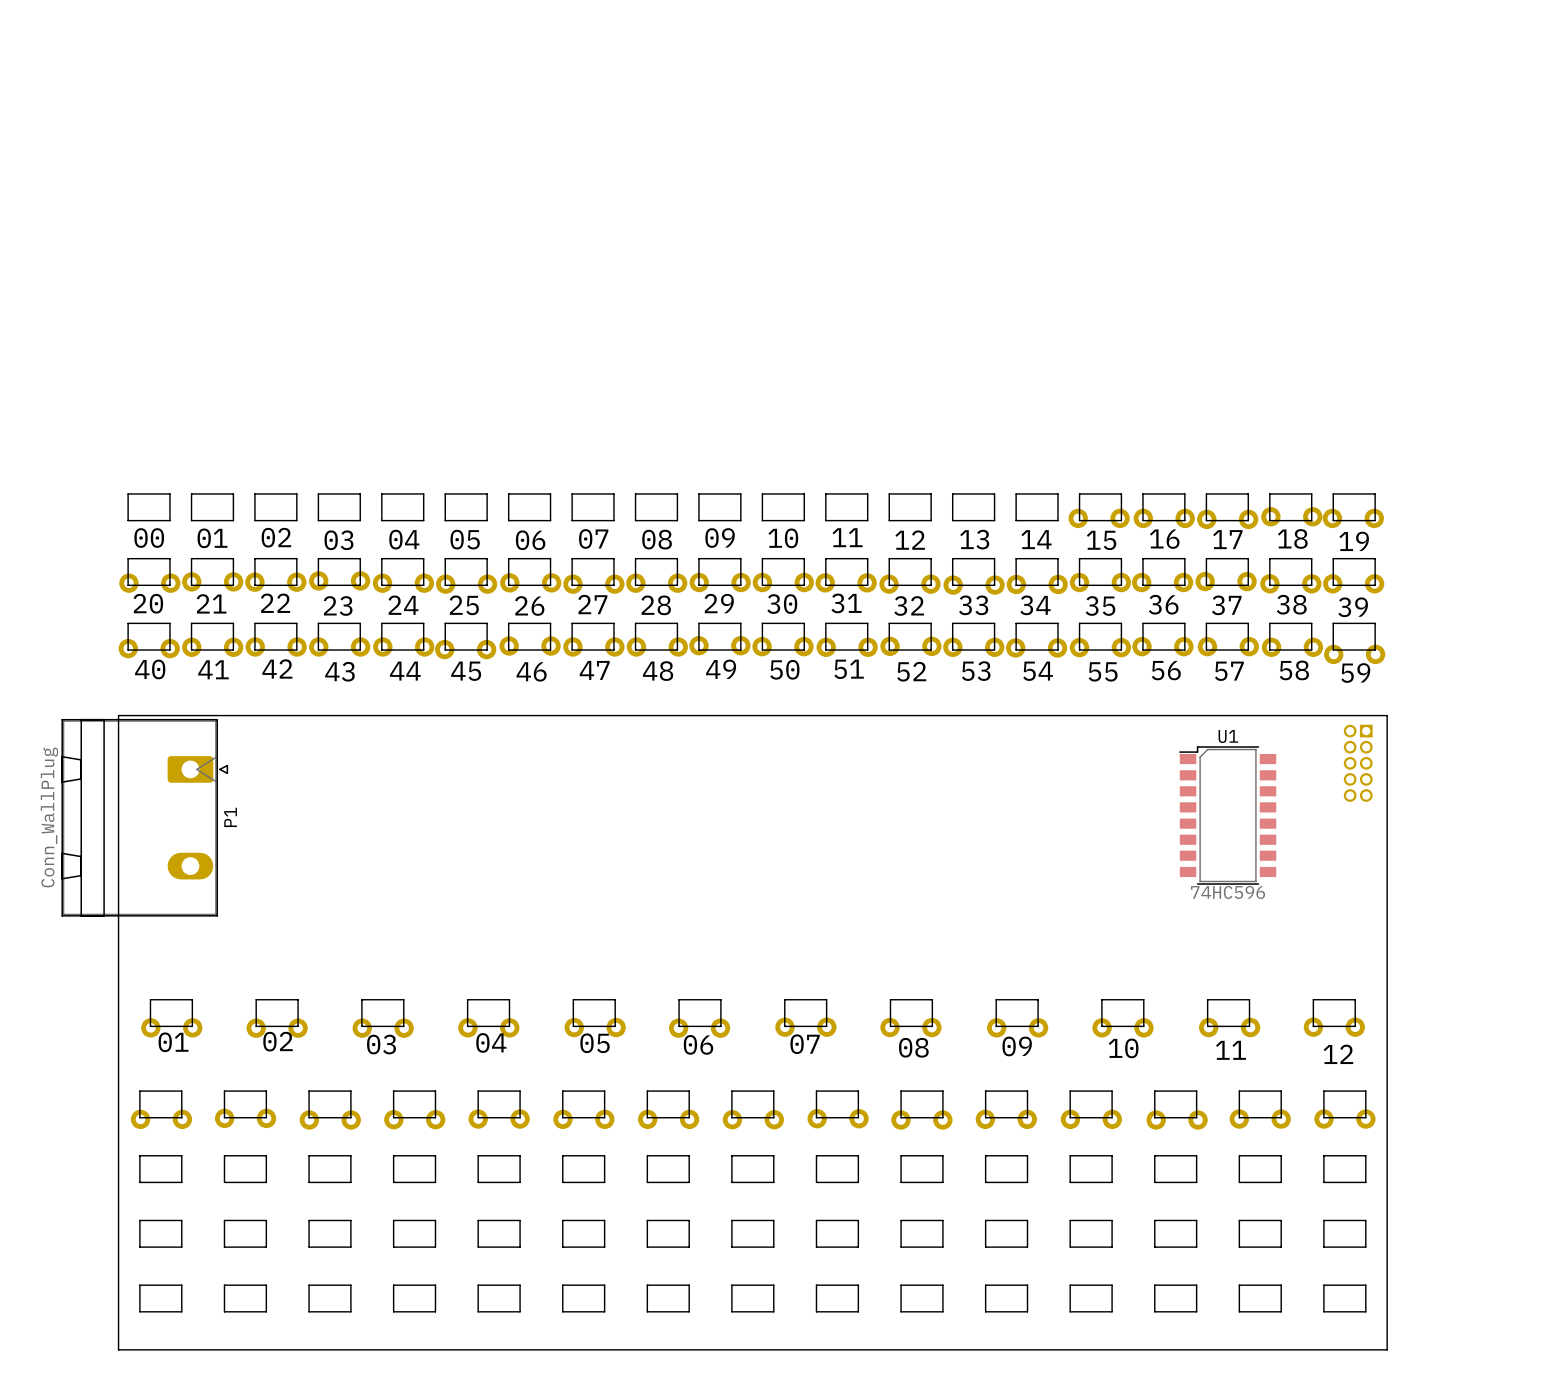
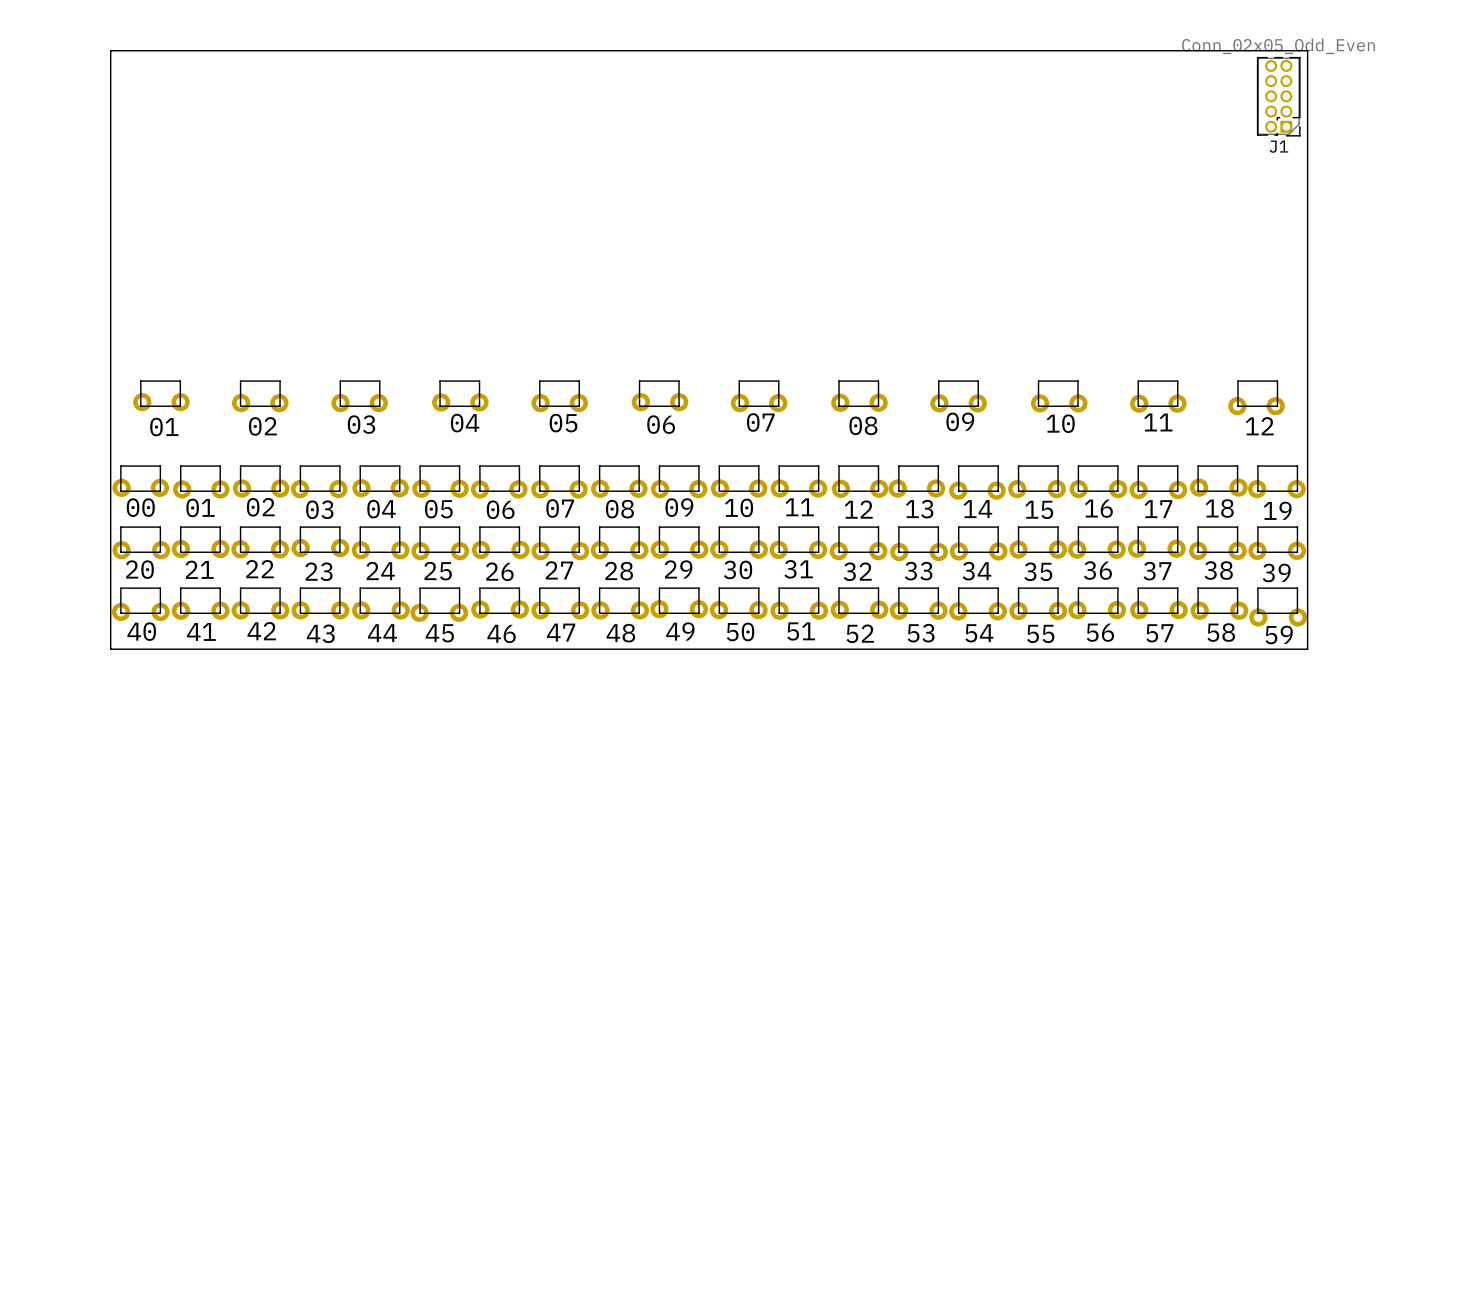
board edge: none -> (110, 50) (1307, 50) (1307, 649) (110, 649) (110, 50)
J1: none -> Conn_02x05_Odd_Even (1278, 96)
board edge: none -> (140, 381) (180, 381) (180, 406) (140, 406) (140, 381)
board edge: none -> (240, 381) (280, 381) (280, 406) (240, 406) (240, 381)
board edge: none -> (340, 381) (379, 381) (379, 406) (340, 406) (340, 381)
board edge: none -> (440, 381) (479, 381) (479, 406) (440, 406) (440, 381)
board edge: none -> (539, 381) (579, 381) (579, 406) (539, 406) (539, 381)
board edge: none -> (639, 381) (679, 381) (679, 406) (639, 406) (639, 381)
board edge: none -> (739, 381) (778, 381) (778, 406) (739, 406) (739, 381)
board edge: none -> (839, 381) (839, 406) (878, 406) (878, 381) (839, 381)
board edge: none -> (938, 381) (978, 381) (978, 406) (938, 406) (938, 381)
board edge: none -> (1038, 381) (1078, 381) (1078, 406) (1038, 406) (1038, 381)
board edge: none -> (1138, 381) (1177, 381) (1177, 406) (1138, 406) (1138, 381)
board edge: none -> (1237, 381) (1277, 381) (1277, 406) (1237, 406) (1237, 381)
part: none -> (161, 402)
part: none -> (460, 402)
part: none -> (660, 402)
part: none -> (859, 402)
part: none -> (260, 403)
part: none -> (359, 403)
part: none -> (559, 403)
part: none -> (759, 403)
part: none -> (958, 403)
part: none -> (1059, 403)
part: none -> (1158, 403)
part: none -> (1256, 406)
text: none -> 07 (760, 422)
text: none -> 09 (960, 421)
text: none -> 11 (1158, 422)
text: none -> 04 (465, 423)
text: none -> 05 (563, 423)
text: none -> 10 (1060, 423)
text: none -> 03 (361, 424)
text: none -> 06 (661, 424)
text: none -> 02 (262, 426)
text: none -> 08 (863, 425)
text: none -> 12 (1259, 426)
text: none -> 01 (164, 427)
part: none -> (140, 487)
part: none -> (261, 488)
part: none -> (380, 488)
part: none -> (739, 488)
part: none -> (798, 488)
part: none -> (916, 488)
part: none -> (201, 489)
part: none -> (319, 489)
part: none -> (440, 488)
part: none -> (499, 489)
part: none -> (559, 489)
part: none -> (619, 488)
part: none -> (679, 489)
part: none -> (860, 488)
part: none -> (977, 490)
board edge: (118, 715) (1387, 715) (1387, 1349) (118, 1349) (118, 715) -> none
part: (1358, 763) -> none
U1: 74HC596 (1227, 815) -> none
P1: Conn_WallPlug (144, 817) -> none
board edge: (150, 999) (192, 999) (192, 1026) (150, 1026) (150, 999) -> none
board edge: (256, 999) (298, 999) (298, 1026) (256, 1026) (256, 999) -> none
board edge: (361, 999) (403, 999) (403, 1026) (361, 1026) (361, 999) -> none
board edge: (467, 999) (509, 999) (509, 1026) (467, 1026) (467, 999) -> none
board edge: (573, 999) (615, 999) (615, 1026) (573, 1026) (573, 999) -> none
board edge: (679, 999) (720, 999) (720, 1026) (679, 1026) (679, 999) -> none
board edge: (784, 999) (826, 999) (826, 1026) (784, 1026) (784, 999) -> none
board edge: (890, 999) (932, 999) (932, 1026) (890, 1026) (890, 999) -> none
board edge: (996, 999) (1038, 999) (1038, 1026) (996, 1026) (996, 999) -> none
board edge: (1101, 999) (1143, 999) (1143, 1026) (1101, 1026) (1101, 999) -> none
board edge: (1207, 999) (1249, 999) (1249, 1026) (1207, 1026) (1207, 999) -> none
board edge: (1313, 999) (1355, 999) (1355, 1026) (1313, 1026) (1313, 999) -> none
part: (171, 1027) -> none
part: (488, 1027) -> none
part: (595, 1027) -> none
part: (805, 1027) -> none
part: (910, 1027) -> none
part: (1017, 1027) -> none
part: (1122, 1027) -> none
part: (1229, 1027) -> none
part: (1334, 1027) -> none
part: (277, 1028) -> none
part: (383, 1028) -> none
part: (699, 1028) -> none
text: 02 (278, 1041) -> none
text: 01 (173, 1042) -> none
text: 04 (491, 1042) -> none
text: 05 (595, 1043) -> none
text: 03 (381, 1044) -> none
text: 06 (698, 1044) -> none
text: 07 (805, 1044) -> none
text: 09 (1017, 1046) -> none
text: 08 (913, 1047) -> none
text: 10 (1123, 1048) -> none
text: 11 (1231, 1050) -> none
text: 12 (1338, 1054) -> none
board edge: (139, 1091) (181, 1091) (181, 1117) (139, 1117) (139, 1091) -> none
board edge: (224, 1091) (266, 1091) (266, 1117) (224, 1117) (224, 1091) -> none
board edge: (309, 1091) (350, 1091) (350, 1117) (309, 1117) (309, 1091) -> none
board edge: (393, 1091) (435, 1091) (435, 1117) (393, 1117) (393, 1091) -> none
board edge: (478, 1091) (520, 1091) (520, 1117) (478, 1117) (478, 1091) -> none
board edge: (562, 1091) (604, 1091) (604, 1117) (562, 1117) (562, 1091) -> none
board edge: (647, 1091) (647, 1117) (689, 1117) (689, 1091) (647, 1091) -> none
board edge: (731, 1091) (731, 1117) (773, 1117) (773, 1091) (731, 1091) -> none
board edge: (816, 1091) (858, 1091) (858, 1117) (816, 1117) (816, 1091) -> none
board edge: (901, 1091) (942, 1091) (942, 1117) (901, 1117) (901, 1091) -> none
board edge: (985, 1091) (1027, 1091) (1027, 1117) (985, 1117) (985, 1091) -> none
board edge: (1070, 1091) (1112, 1091) (1112, 1117) (1070, 1117) (1070, 1091) -> none
board edge: (1154, 1091) (1196, 1091) (1196, 1117) (1154, 1117) (1154, 1091) -> none
board edge: (1239, 1091) (1281, 1091) (1281, 1117) (1239, 1117) (1239, 1091) -> none
board edge: (1323, 1091) (1365, 1091) (1365, 1117) (1323, 1117) (1323, 1091) -> none
part: (245, 1118) -> none
part: (838, 1118) -> none
part: (161, 1119) -> none
part: (414, 1119) -> none
part: (499, 1119) -> none
part: (583, 1119) -> none
part: (668, 1119) -> none
part: (753, 1119) -> none
part: (1006, 1119) -> none
part: (1091, 1119) -> none
part: (1260, 1119) -> none
part: (1344, 1119) -> none
part: (330, 1120) -> none
part: (921, 1120) -> none
part: (1177, 1120) -> none
board edge: (139, 1155) (181, 1155) (181, 1182) (139, 1182) (139, 1155) -> none
board edge: (224, 1155) (224, 1182) (266, 1182) (266, 1155) (224, 1155) -> none
board edge: (309, 1155) (350, 1155) (350, 1182) (309, 1182) (309, 1155) -> none
board edge: (393, 1155) (393, 1182) (435, 1182) (435, 1155) (393, 1155) -> none
board edge: (478, 1155) (520, 1155) (520, 1182) (478, 1182) (478, 1155) -> none
board edge: (562, 1155) (604, 1155) (604, 1182) (562, 1182) (562, 1155) -> none
board edge: (647, 1155) (647, 1182) (689, 1182) (689, 1155) (647, 1155) -> none
board edge: (731, 1155) (731, 1182) (773, 1182) (773, 1155) (731, 1155) -> none
board edge: (816, 1155) (858, 1155) (858, 1182) (816, 1182) (816, 1155) -> none
board edge: (901, 1155) (901, 1182) (942, 1182) (942, 1155) (901, 1155) -> none
board edge: (985, 1155) (1027, 1155) (1027, 1182) (985, 1182) (985, 1155) -> none
board edge: (1070, 1155) (1112, 1155) (1112, 1182) (1070, 1182) (1070, 1155) -> none
board edge: (1154, 1155) (1196, 1155) (1196, 1182) (1154, 1182) (1154, 1155) -> none
board edge: (1239, 1155) (1239, 1182) (1281, 1182) (1281, 1155) (1239, 1155) -> none
board edge: (1323, 1155) (1365, 1155) (1365, 1182) (1323, 1182) (1323, 1155) -> none
board edge: (139, 1220) (181, 1220) (181, 1247) (139, 1247) (139, 1220) -> none
board edge: (224, 1220) (266, 1220) (266, 1247) (224, 1247) (224, 1220) -> none
board edge: (309, 1220) (350, 1220) (350, 1247) (309, 1247) (309, 1220) -> none
board edge: (393, 1220) (435, 1220) (435, 1247) (393, 1247) (393, 1220) -> none
board edge: (478, 1220) (520, 1220) (520, 1247) (478, 1247) (478, 1220) -> none
board edge: (562, 1220) (604, 1220) (604, 1247) (562, 1247) (562, 1220) -> none
board edge: (647, 1220) (647, 1247) (689, 1247) (689, 1220) (647, 1220) -> none
board edge: (731, 1220) (773, 1220) (773, 1247) (731, 1247) (731, 1220) -> none
board edge: (816, 1220) (858, 1220) (858, 1247) (816, 1247) (816, 1220) -> none
board edge: (901, 1220) (942, 1220) (942, 1247) (901, 1247) (901, 1220) -> none
board edge: (985, 1220) (1027, 1220) (1027, 1247) (985, 1247) (985, 1220) -> none
board edge: (1070, 1220) (1112, 1220) (1112, 1247) (1070, 1247) (1070, 1220) -> none
board edge: (1154, 1220) (1196, 1220) (1196, 1247) (1154, 1247) (1154, 1220) -> none
board edge: (1239, 1220) (1281, 1220) (1281, 1247) (1239, 1247) (1239, 1220) -> none
board edge: (1323, 1220) (1365, 1220) (1365, 1247) (1323, 1247) (1323, 1220) -> none
board edge: (139, 1285) (181, 1285) (181, 1311) (139, 1311) (139, 1285) -> none
board edge: (224, 1285) (266, 1285) (266, 1311) (224, 1311) (224, 1285) -> none
board edge: (309, 1285) (350, 1285) (350, 1311) (309, 1311) (309, 1285) -> none
board edge: (393, 1285) (435, 1285) (435, 1311) (393, 1311) (393, 1285) -> none
board edge: (478, 1285) (520, 1285) (520, 1311) (478, 1311) (478, 1285) -> none
board edge: (562, 1285) (604, 1285) (604, 1311) (562, 1311) (562, 1285) -> none
board edge: (647, 1285) (689, 1285) (689, 1311) (647, 1311) (647, 1285) -> none
board edge: (731, 1285) (773, 1285) (773, 1311) (731, 1311) (731, 1285) -> none
board edge: (816, 1285) (858, 1285) (858, 1311) (816, 1311) (816, 1285) -> none
board edge: (901, 1285) (942, 1285) (942, 1311) (901, 1311) (901, 1285) -> none
board edge: (985, 1285) (1027, 1285) (1027, 1311) (985, 1311) (985, 1285) -> none
board edge: (1070, 1285) (1112, 1285) (1112, 1311) (1070, 1311) (1070, 1285) -> none
board edge: (1154, 1285) (1196, 1285) (1196, 1311) (1154, 1311) (1154, 1285) -> none
board edge: (1239, 1285) (1281, 1285) (1281, 1311) (1239, 1311) (1239, 1285) -> none
board edge: (1323, 1285) (1365, 1285) (1365, 1311) (1323, 1311) (1323, 1285) -> none

